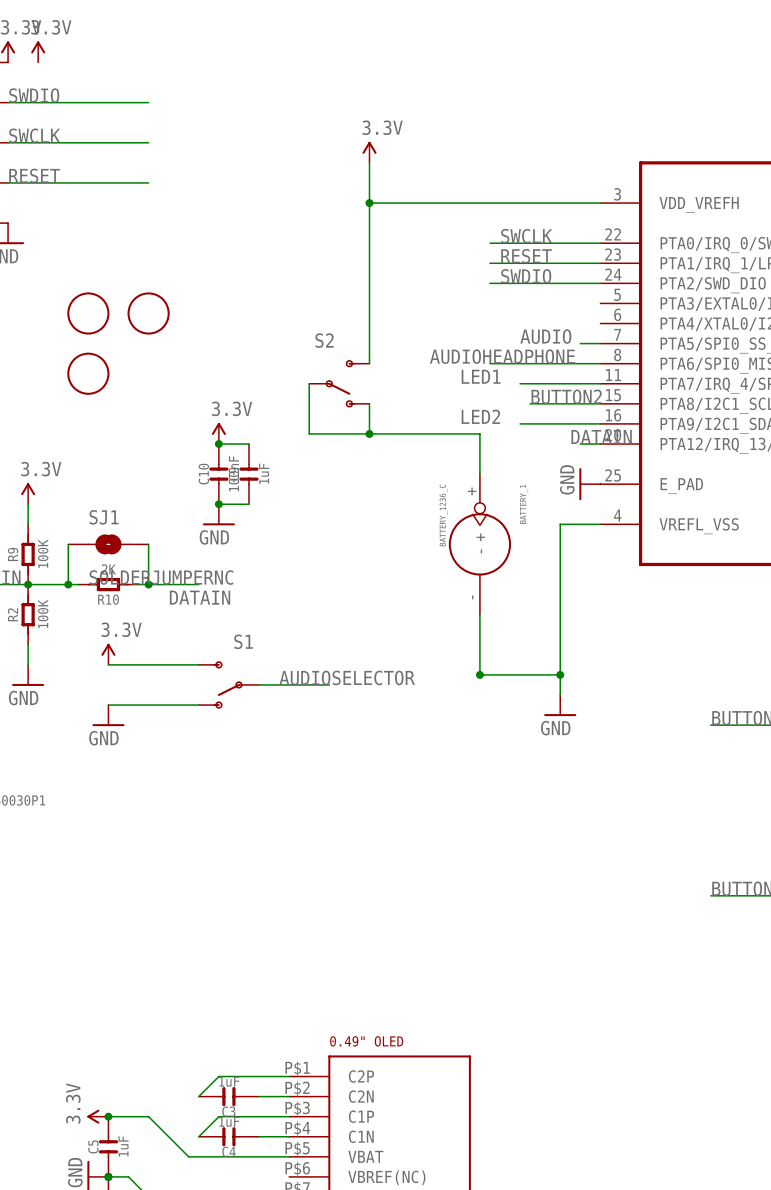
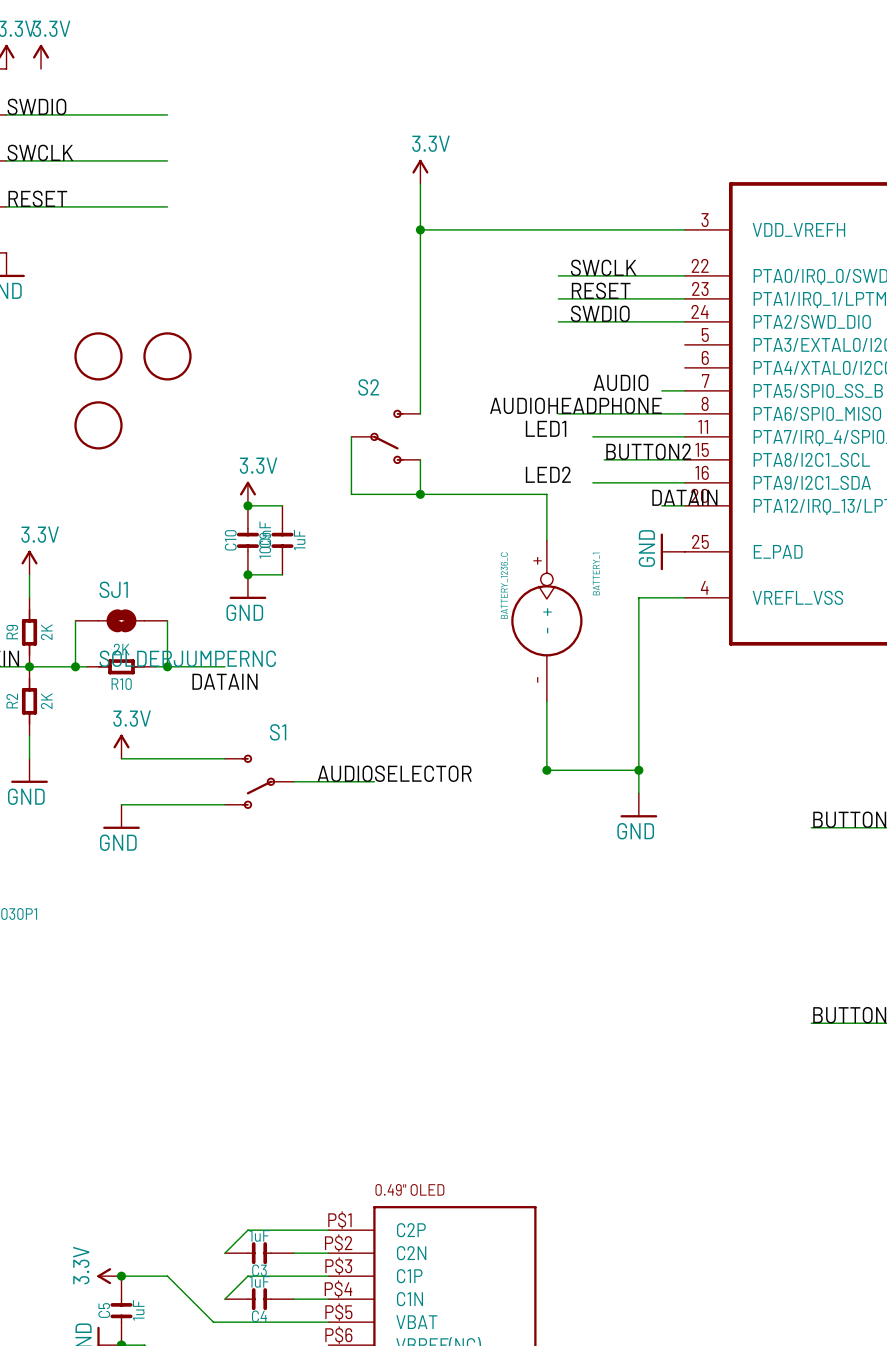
R9 value: 100K (43, 553) -> 2K (46, 632)
R2 value: 100K (43, 613) -> 2K (46, 701)

